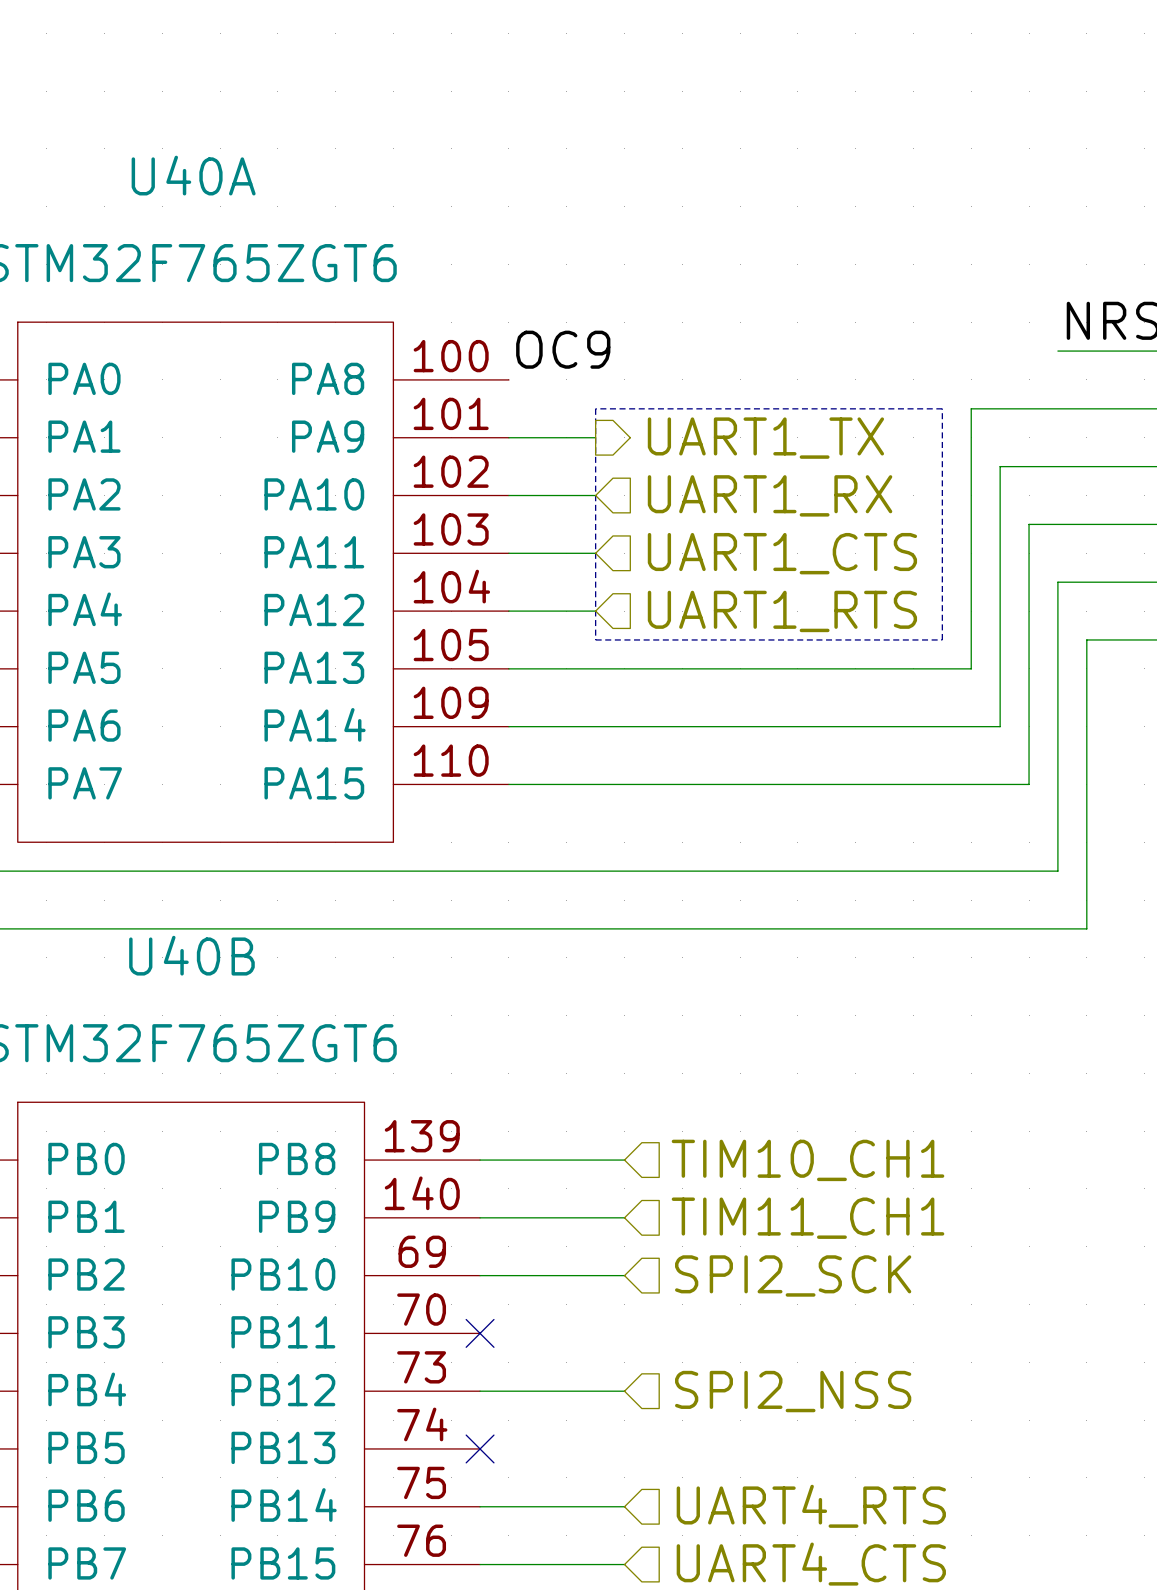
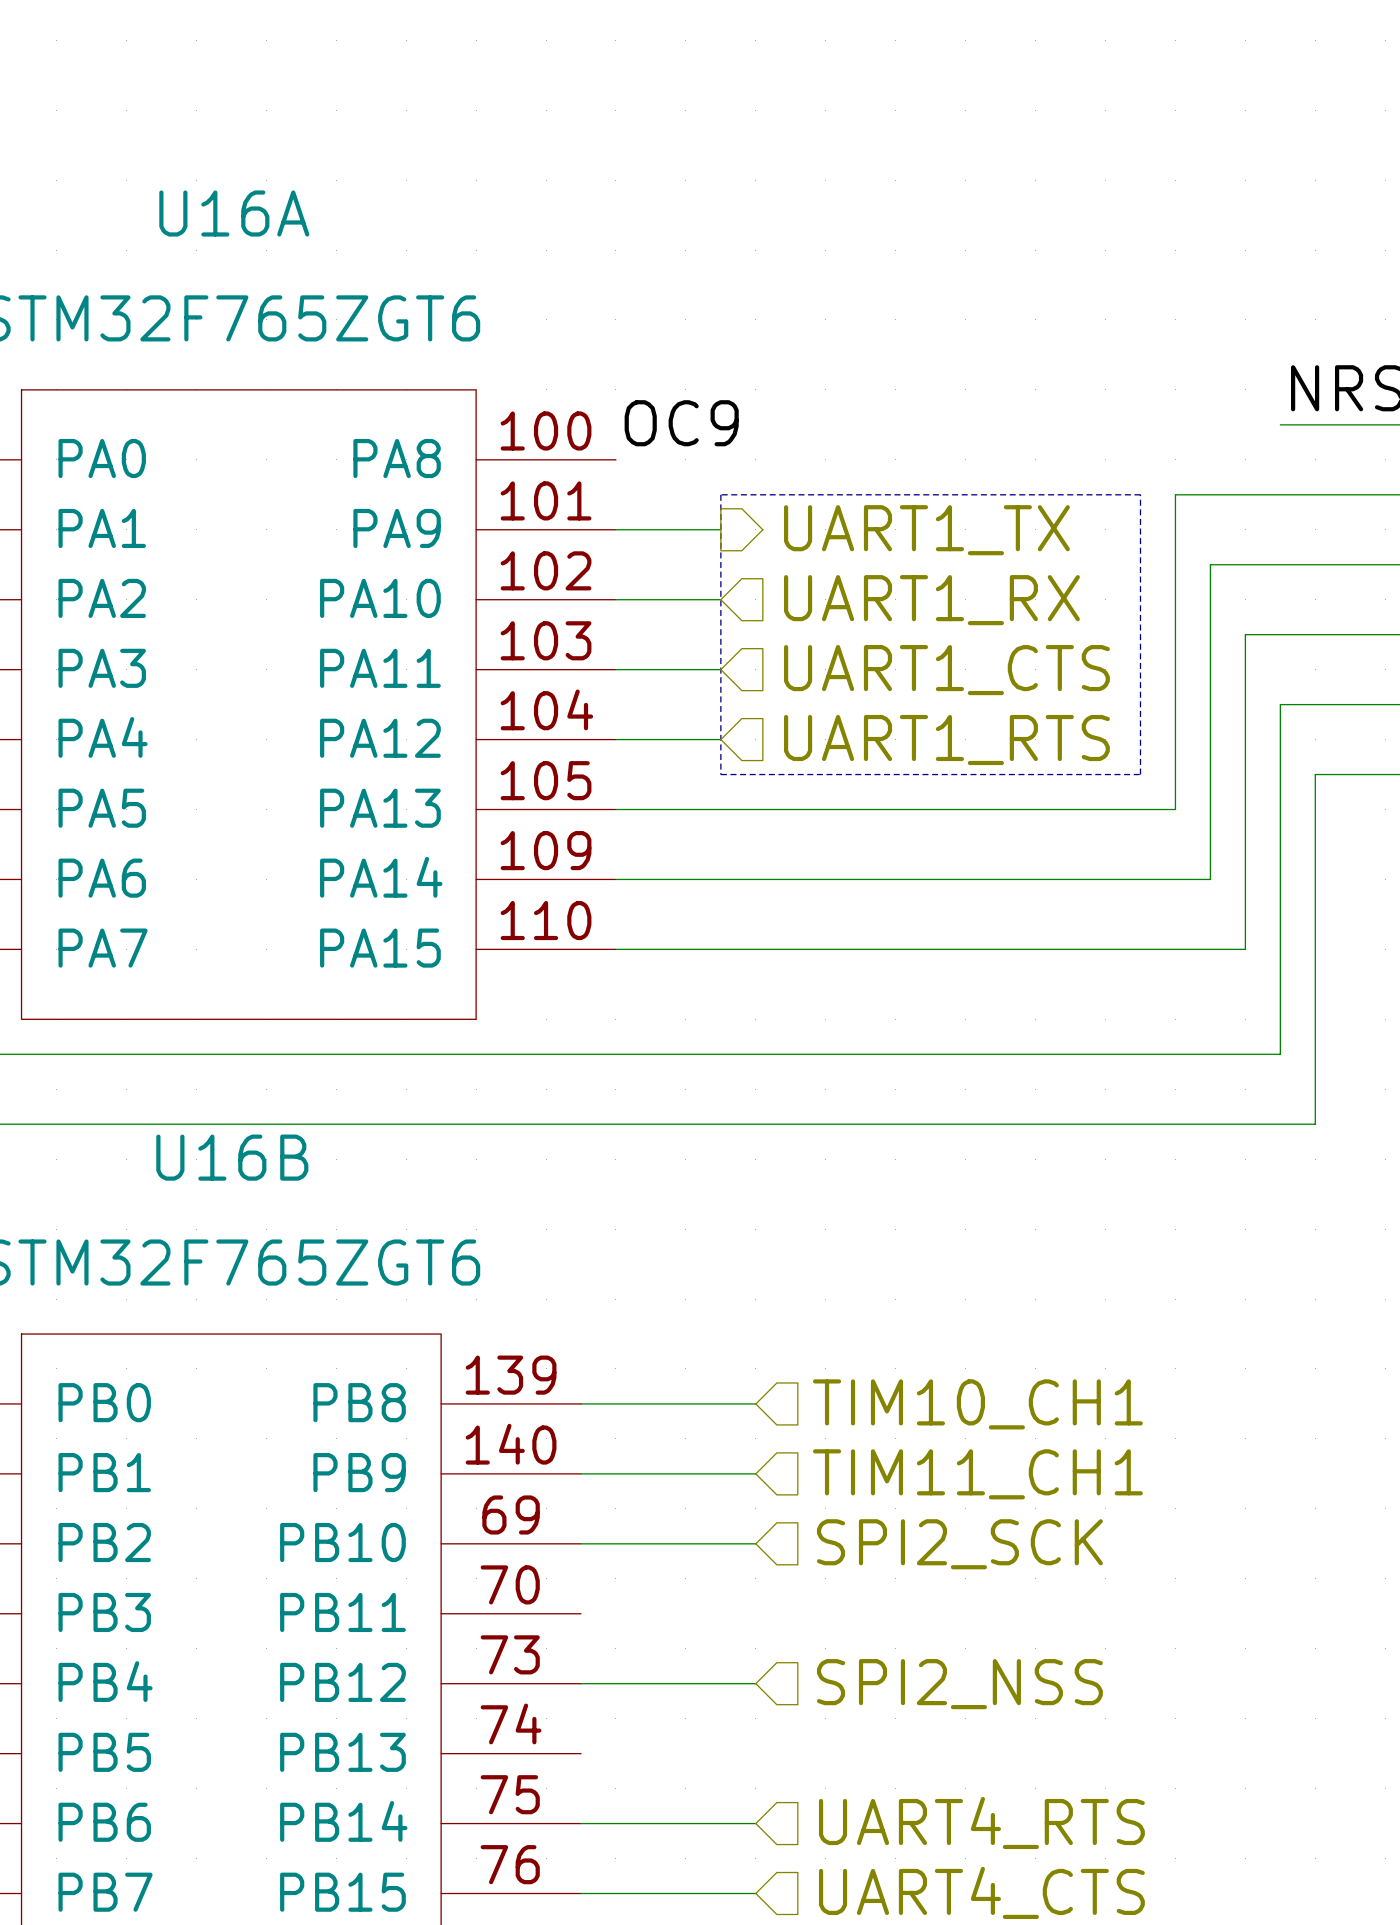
U40A name: U40A (193, 175) -> U16A (234, 213)
U40B name: U40B (191, 955) -> U16B (232, 1157)
no-connect mark: (480, 1333) -> none
no-connect mark: (480, 1448) -> none

